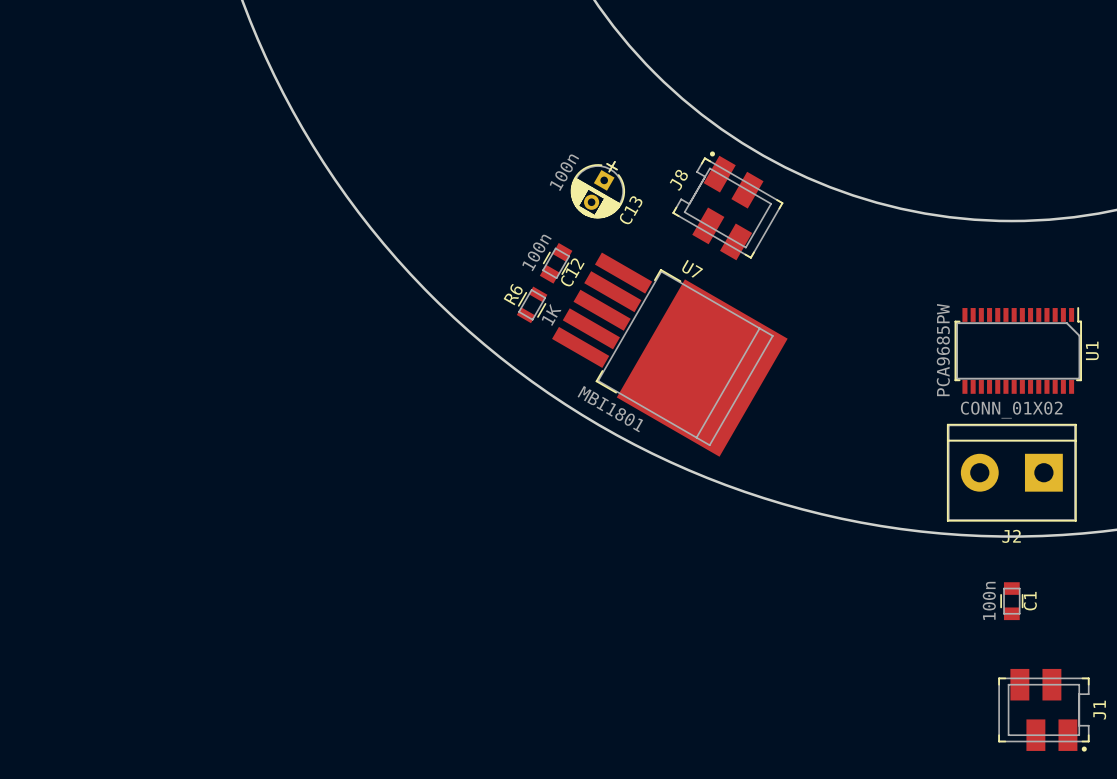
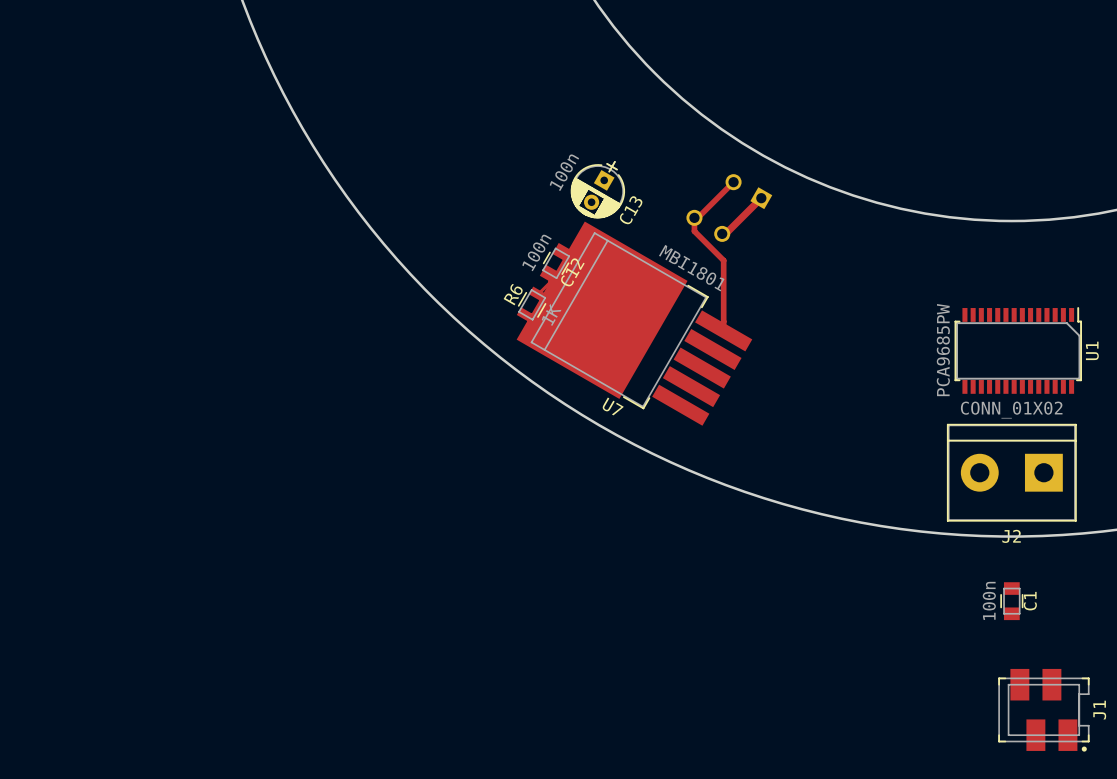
track: none -> (733, 182) (697, 217) (694, 217) (694, 231) (723, 260) (723, 330)
track: none -> (761, 198) (725, 233) (722, 233)
J8: (727, 205) -> none
part: none -> (729, 208)
track: none -> (549, 274) (549, 282) (538, 294)
U7 rotation: 0° (669, 354) -> 180° (634, 323)

